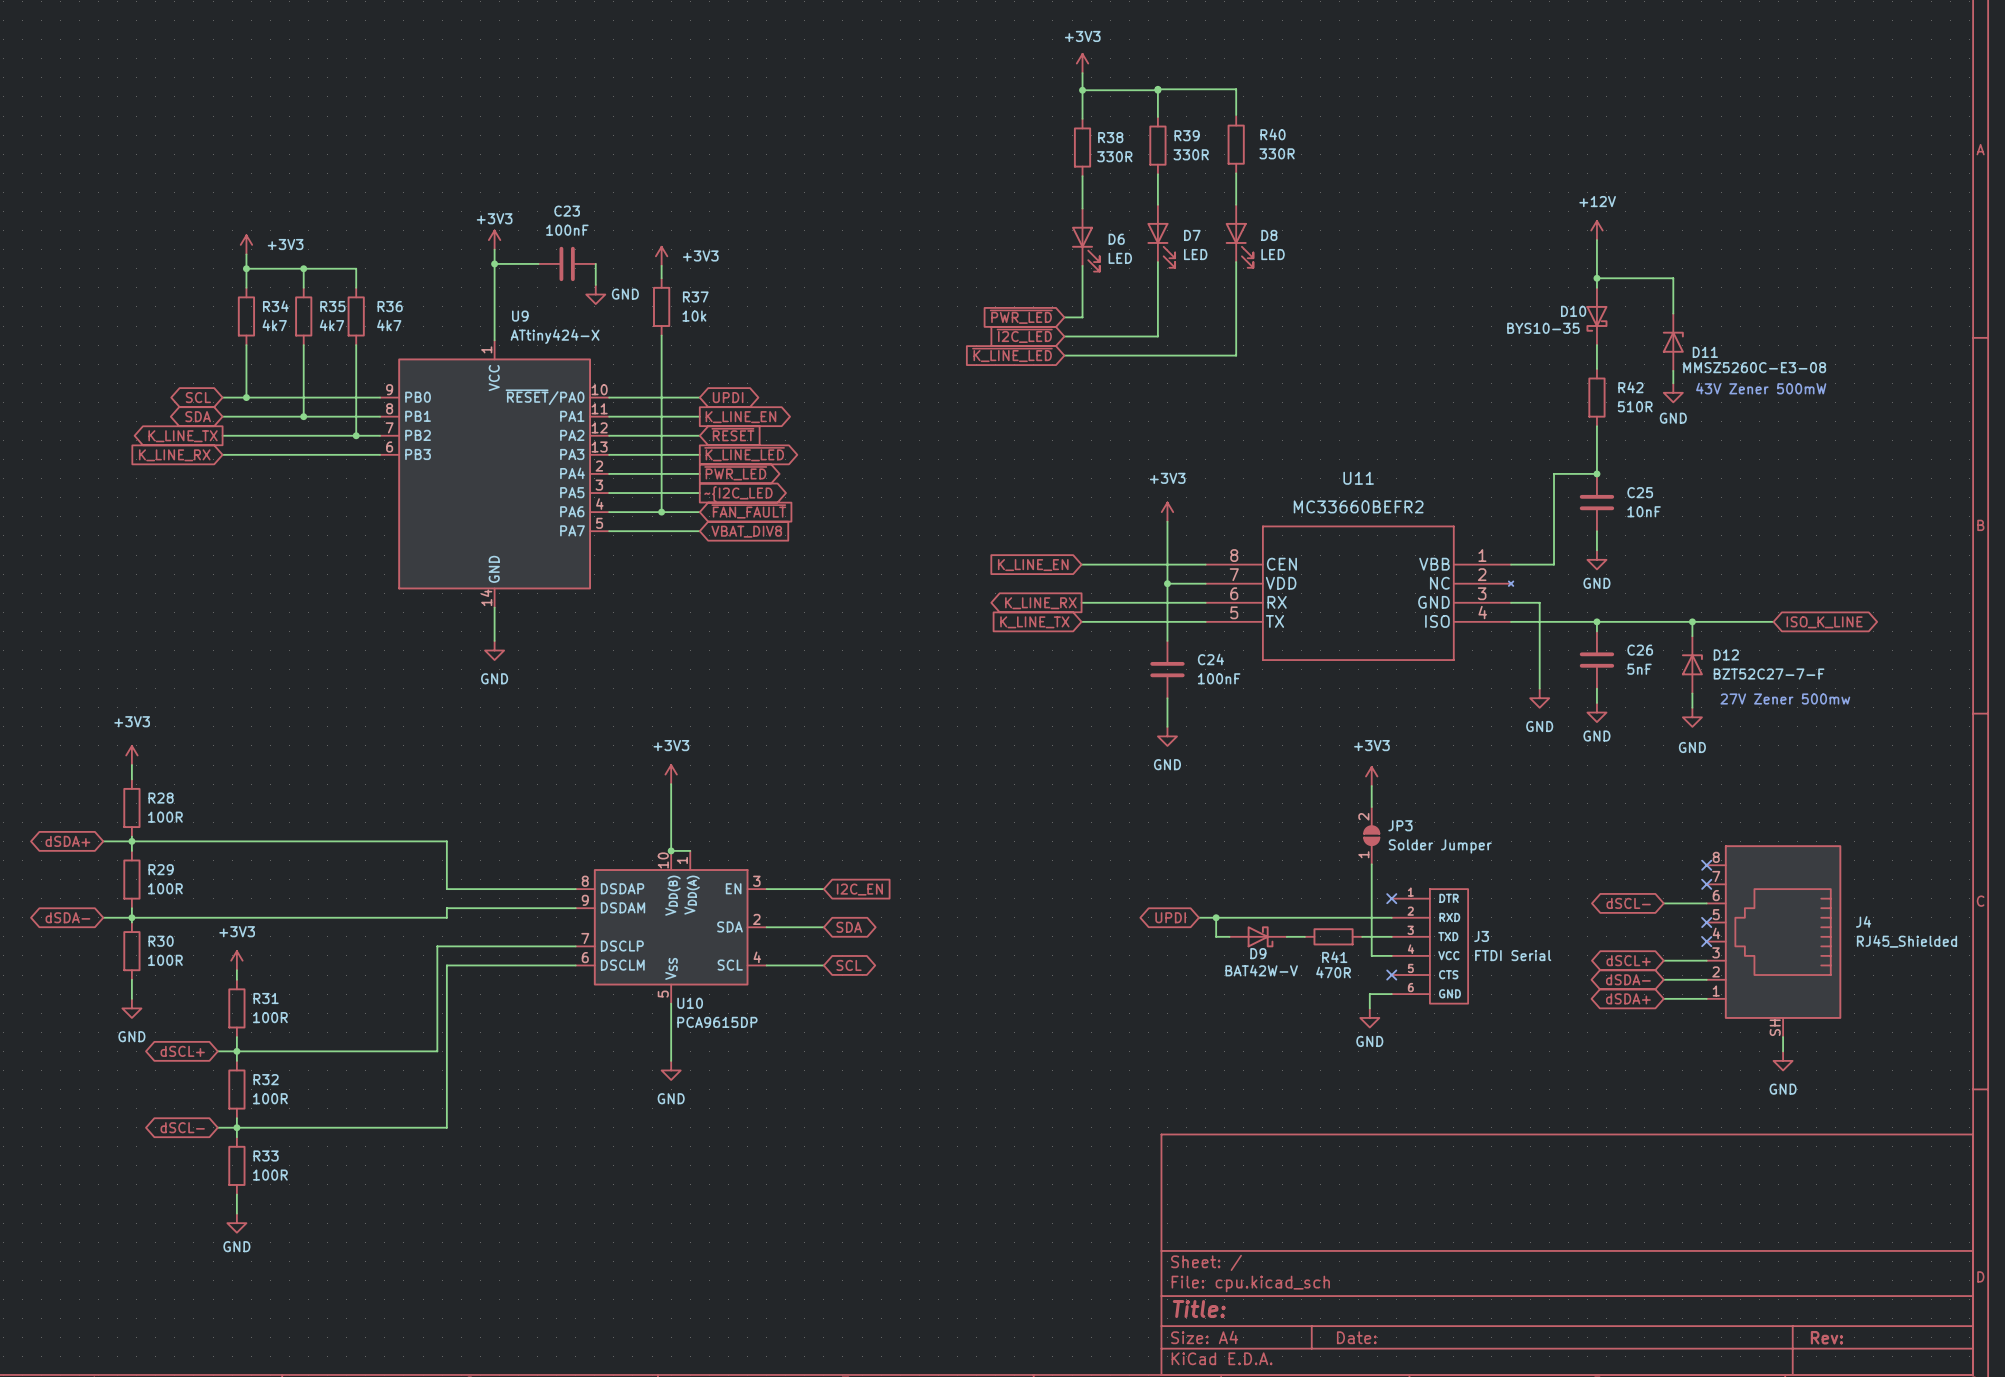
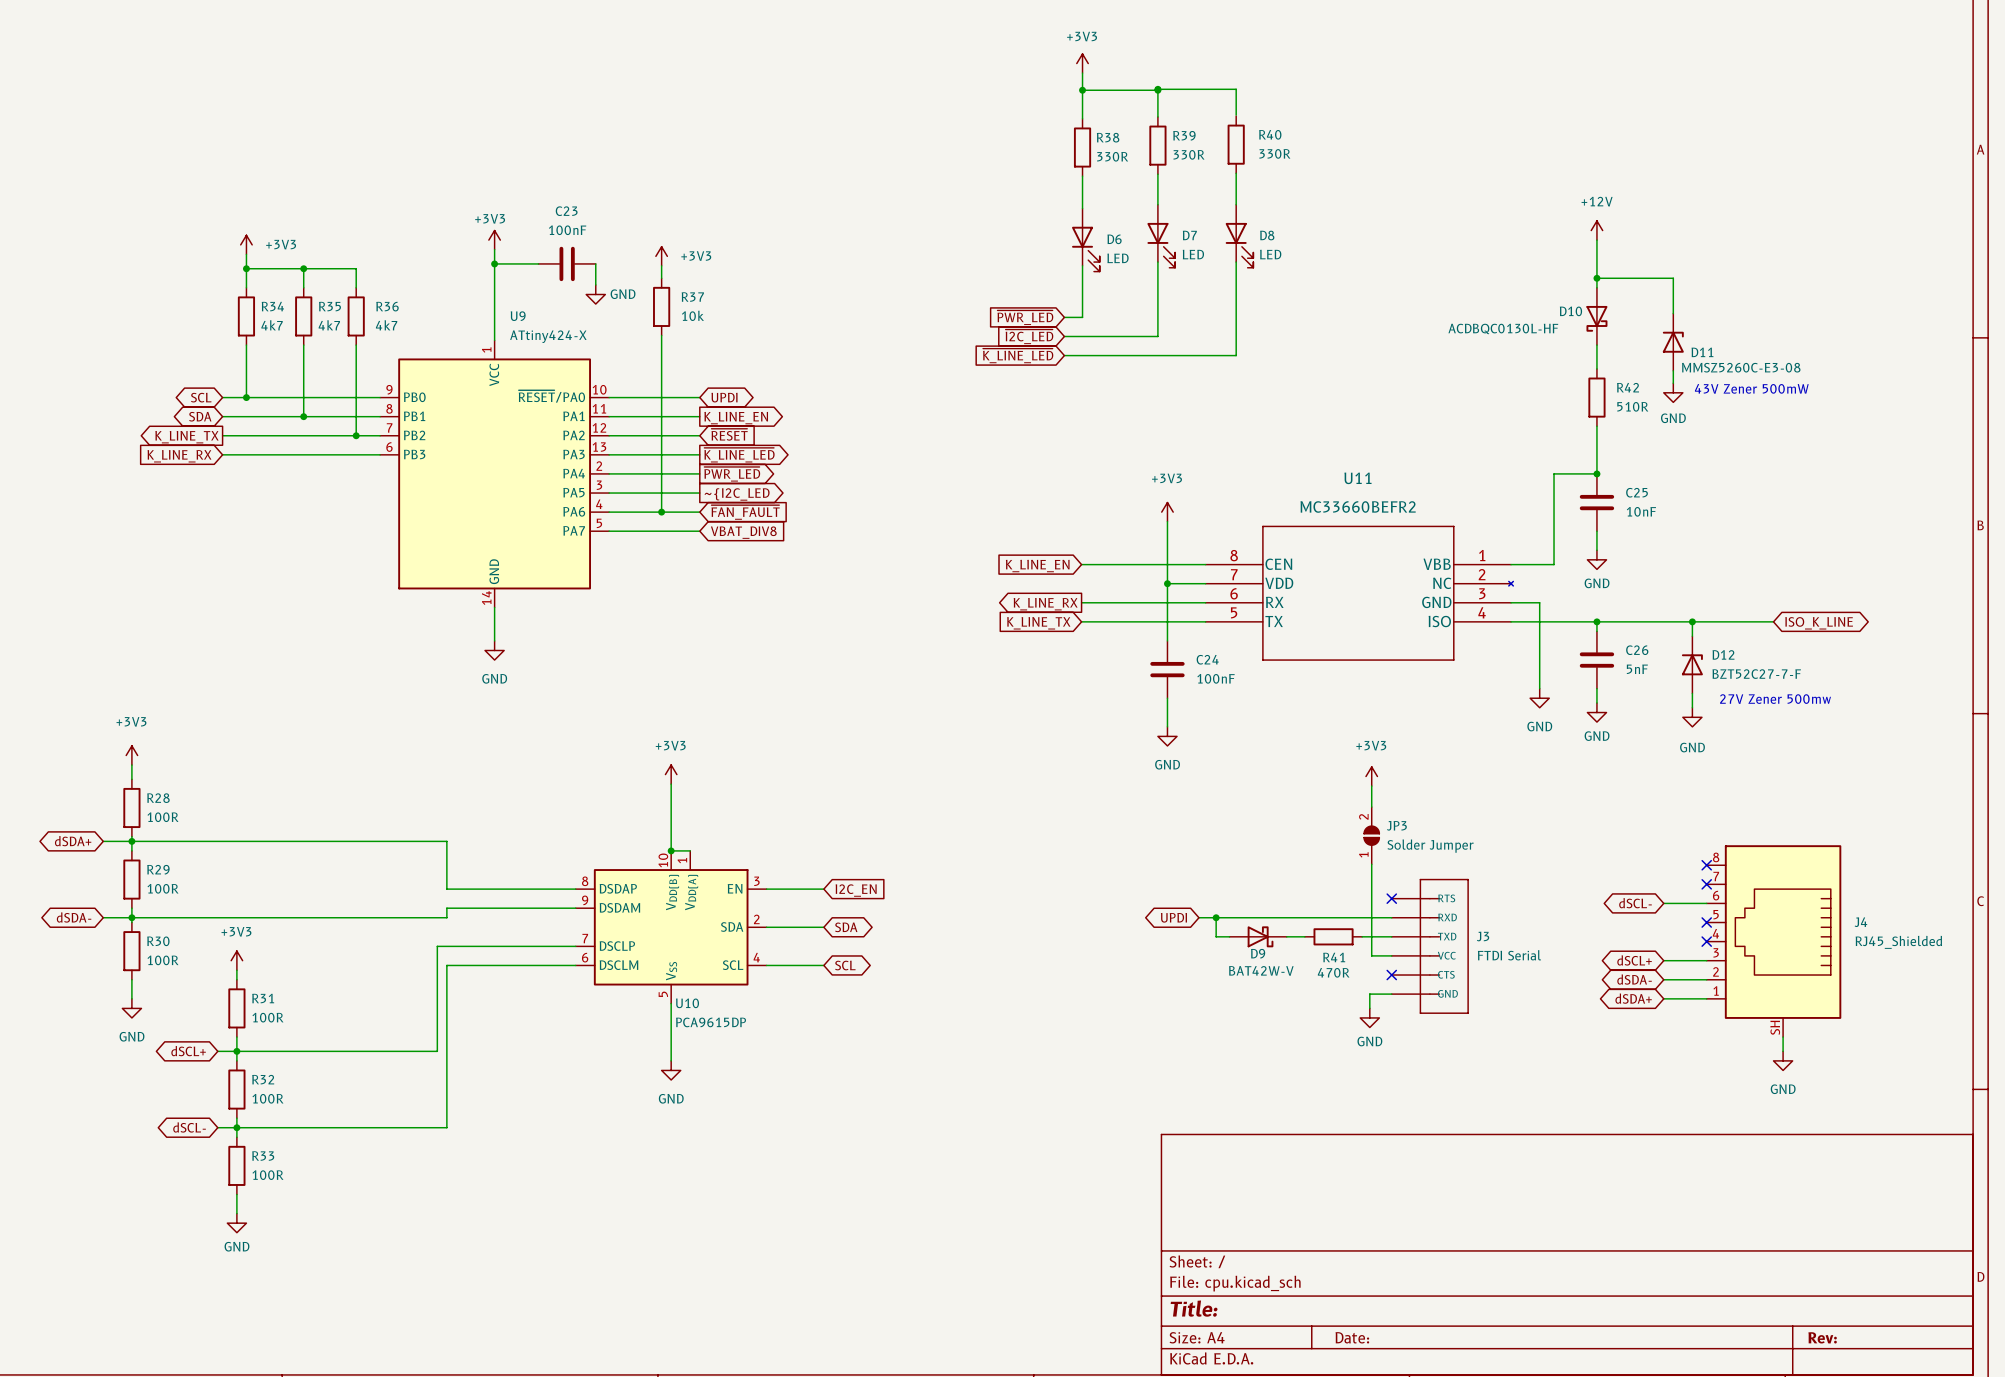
D10 value: BYS10-35 (1543, 328) -> ACDBQC0130L-HF (1503, 328)
J3 symbol: [1391, 889, 1469, 1004] -> [1391, 879, 1469, 1014]

